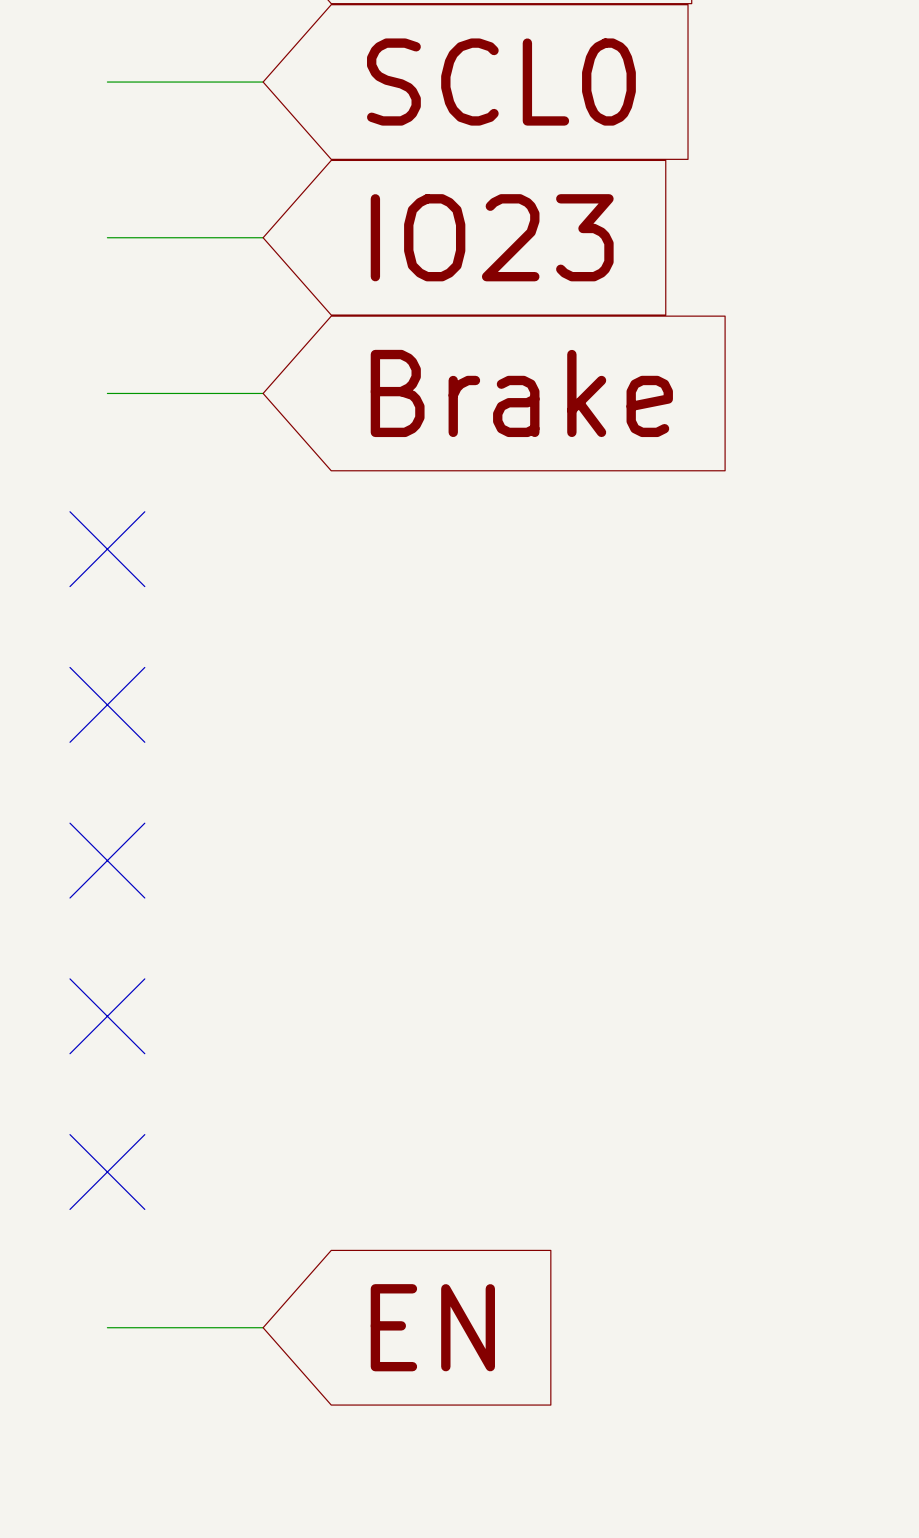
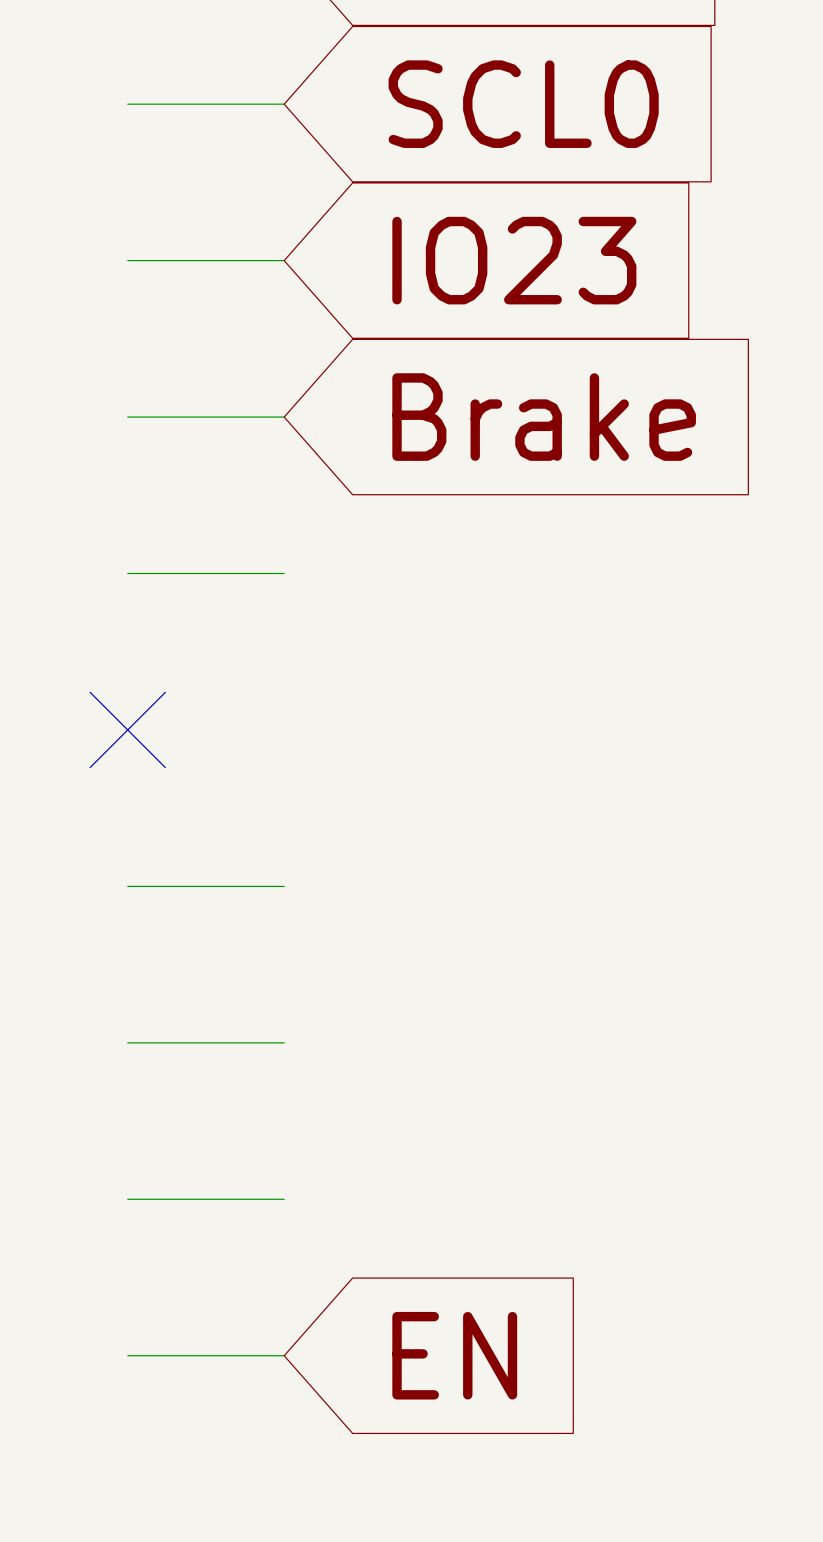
wire: none -> (127, 573) (284, 573)
no-connect mark: (107, 549) -> none
wire: none -> (127, 886) (284, 886)
no-connect mark: (107, 860) -> none
wire: none -> (127, 1042) (284, 1042)
no-connect mark: (107, 1016) -> none
wire: none -> (127, 1199) (284, 1199)
no-connect mark: (107, 1172) -> none

